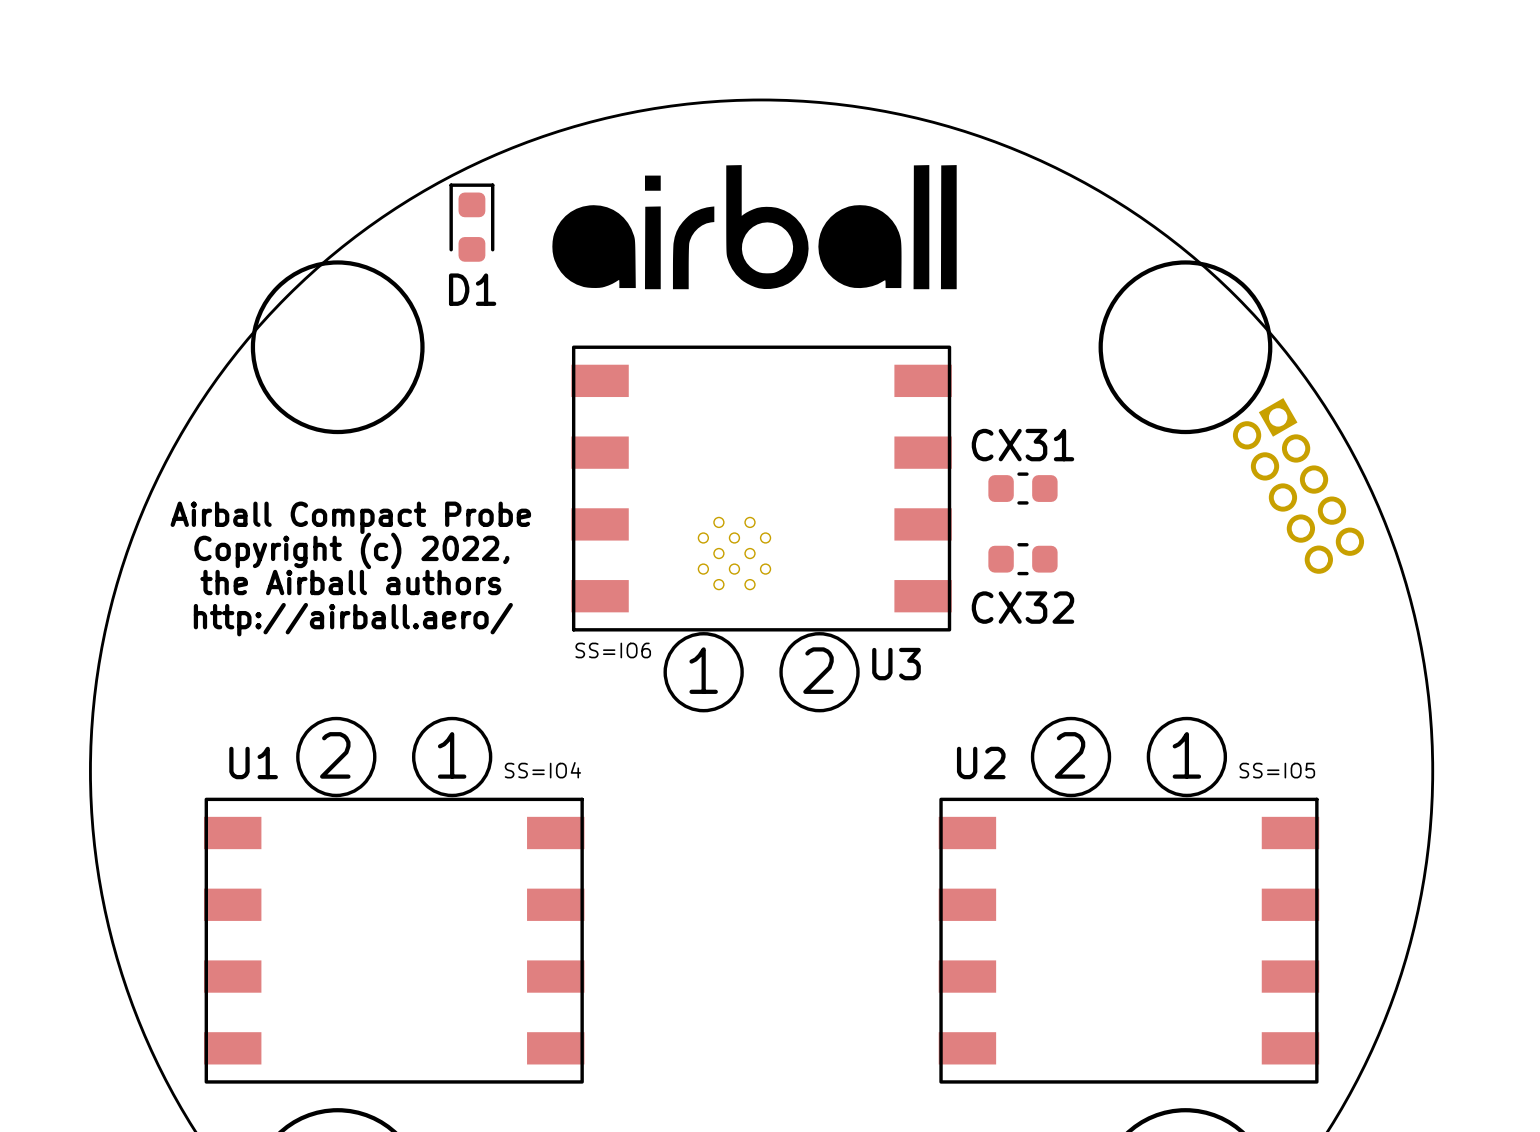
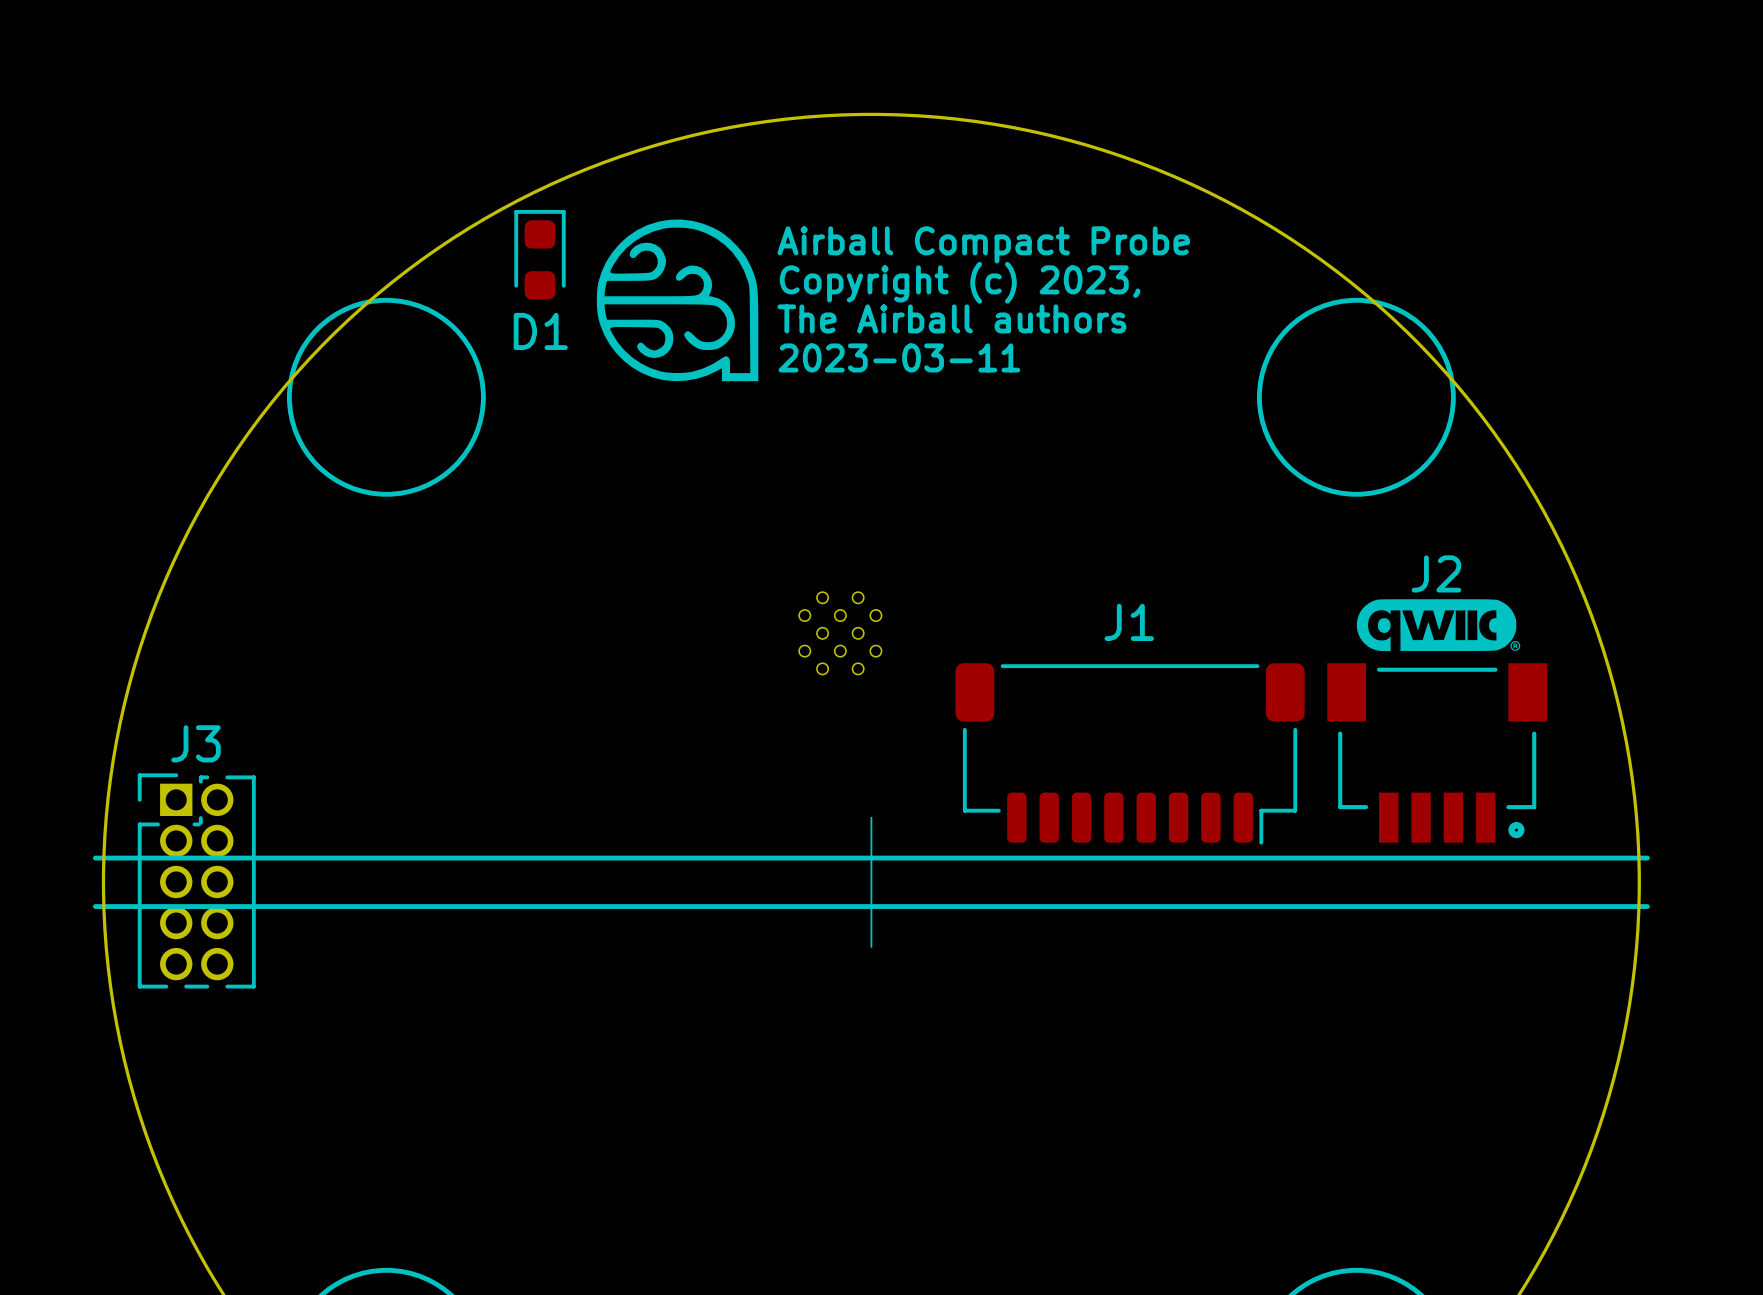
drawing: [552, 165, 957, 290] -> none
drawing: none -> [596, 219, 759, 382]
text: none -> Copyright (c) 2023, (960, 282)
text: none -> The Airball authors (951, 318)
text: none -> 2023-03-11 (899, 357)
part: (1298, 485) -> none
CX31: (1022, 488) -> none
text position: Airball Compact Probe (350, 517) -> Airball Compact Probe (983, 244)
drawing: none -> [1356, 599, 1521, 652]
U3: (761, 528) -> none
text: Copyright (c) 2022, (351, 550) -> none
CX32: (1022, 559) -> none
text: the Airball authors (350, 582) -> none
text: http://airball.aero/ (353, 619) -> none
text: SS=IO6 (613, 650) -> none
J1: none -> (1130, 753)
J2: none -> (1437, 752)
line: none -> (871, 817) (871, 946)
line: none -> (95, 858) (1647, 858)
J3: none -> (196, 880)
text: SS=IO4 (542, 770) -> none
text: SS=IO5 (1277, 770) -> none
line: none -> (95, 906) (1647, 906)
U1: (394, 900) -> none
U2: (1128, 900) -> none

